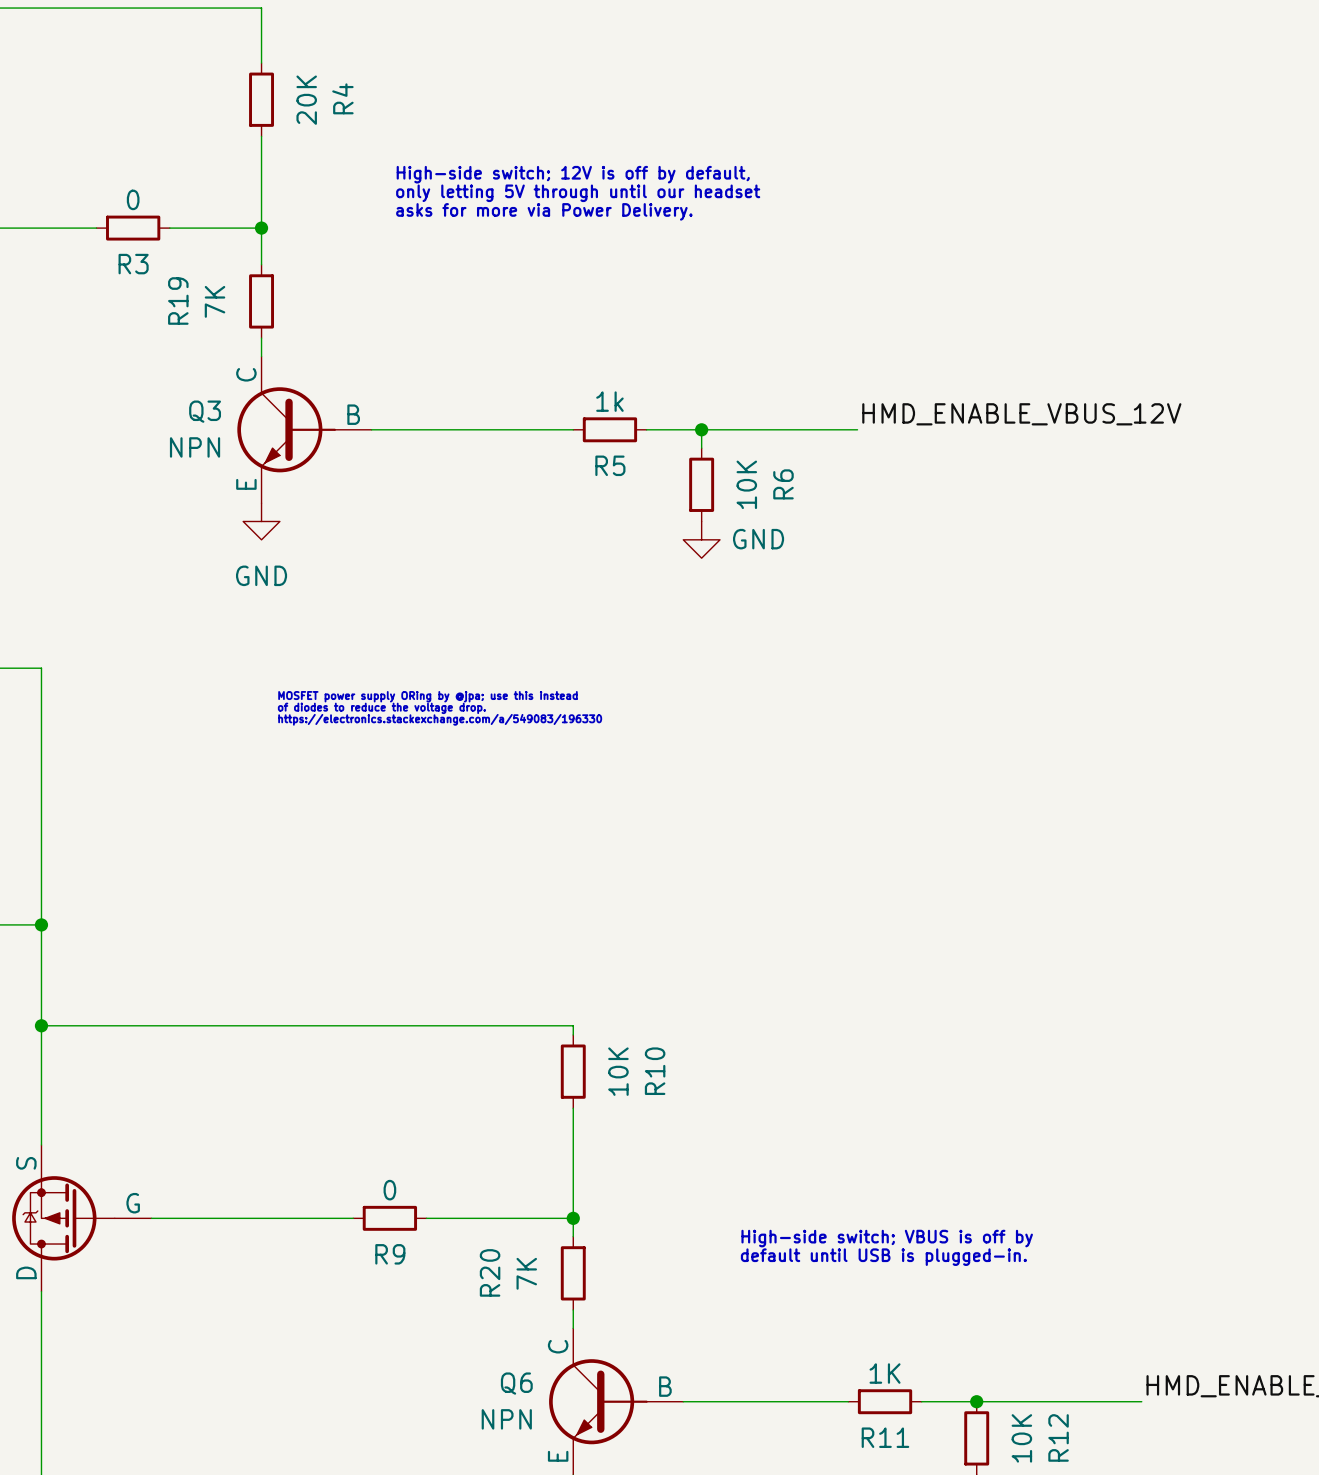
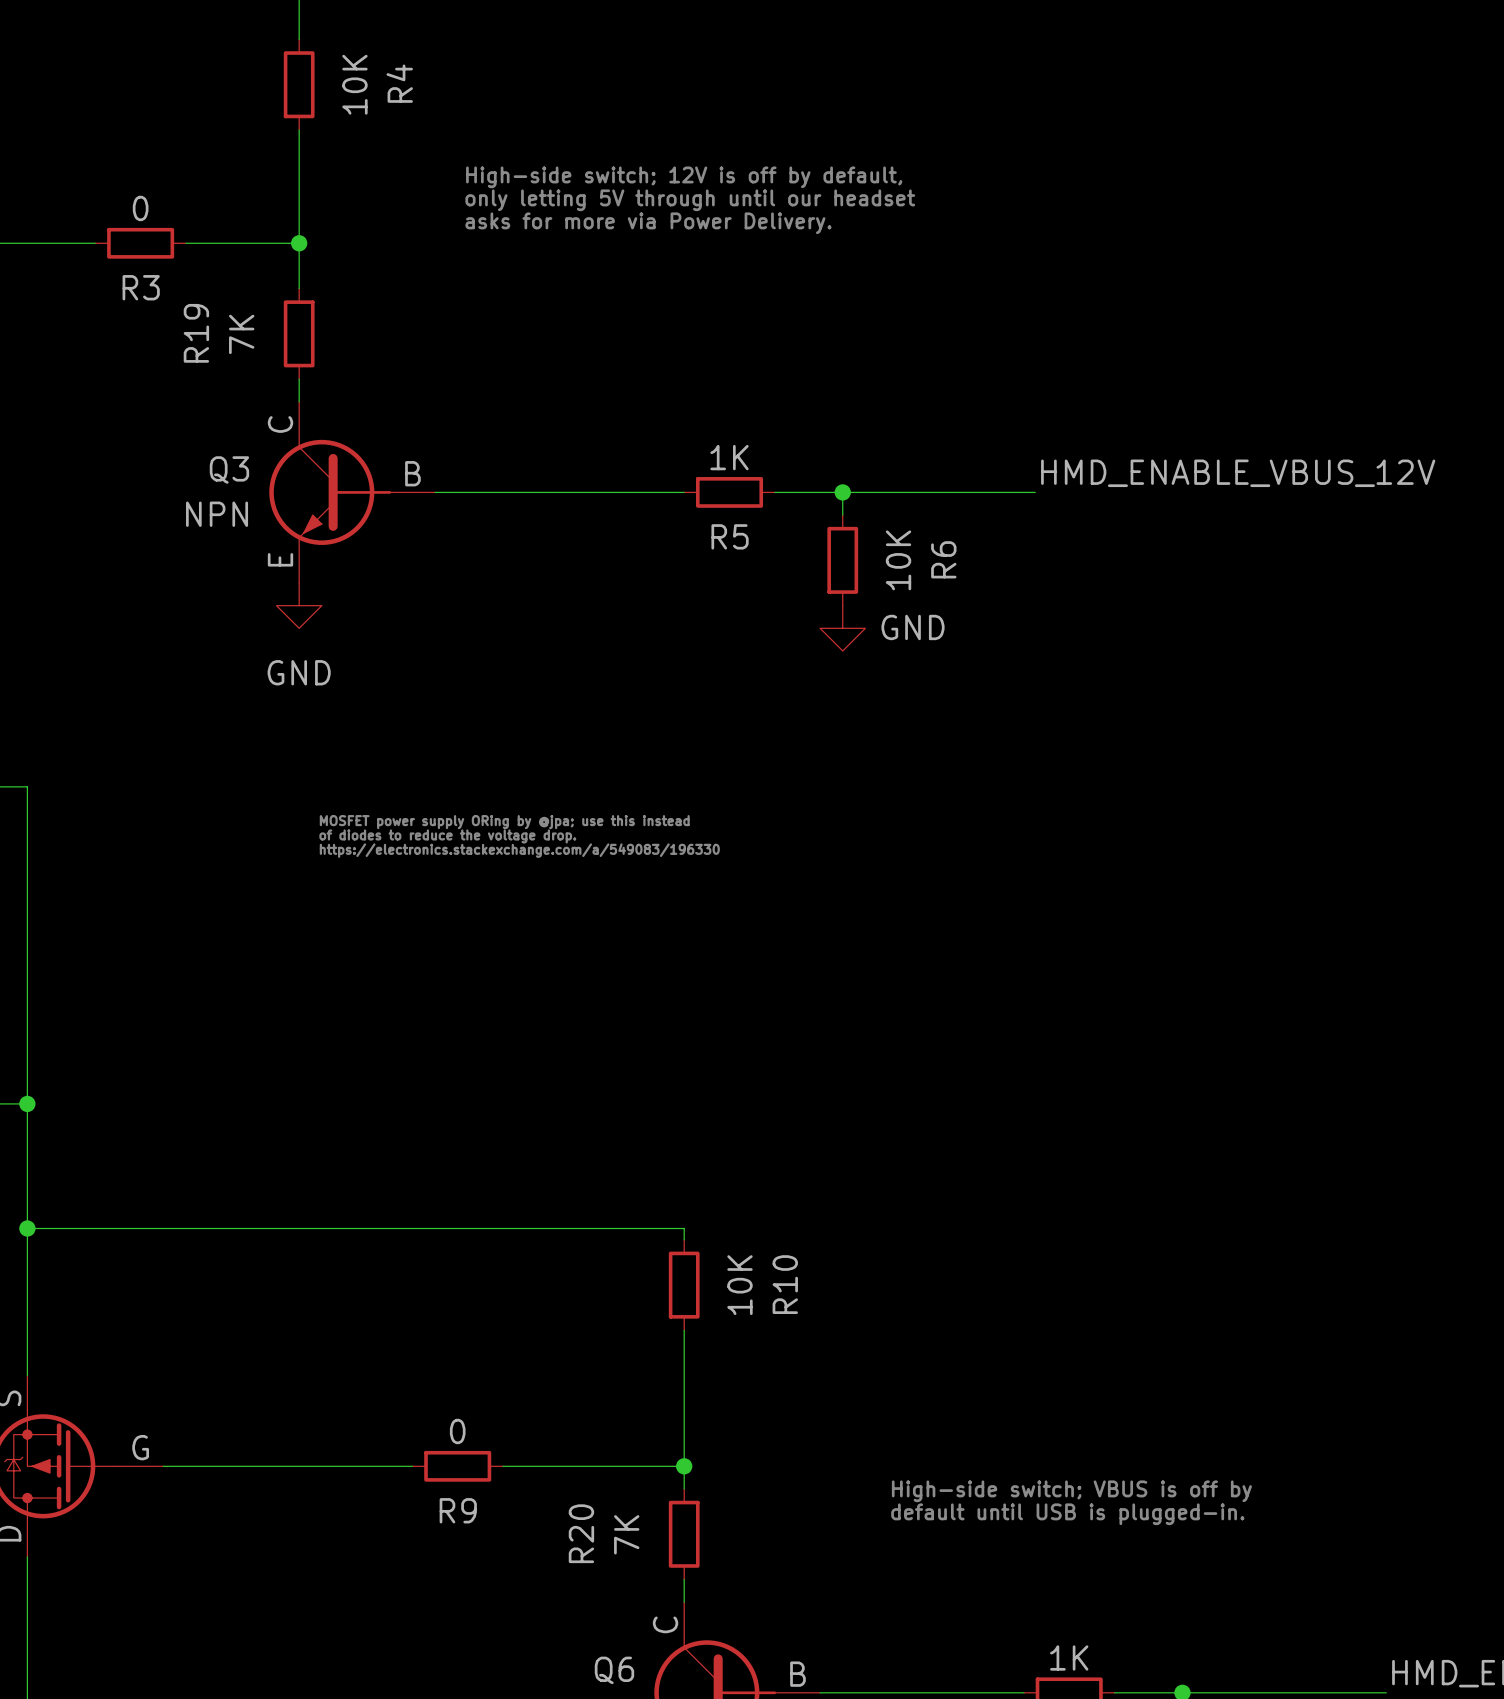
R4 value: 20K (306, 100) -> 10K (354, 84)
R5 value: 1k (609, 401) -> 1K (729, 457)

